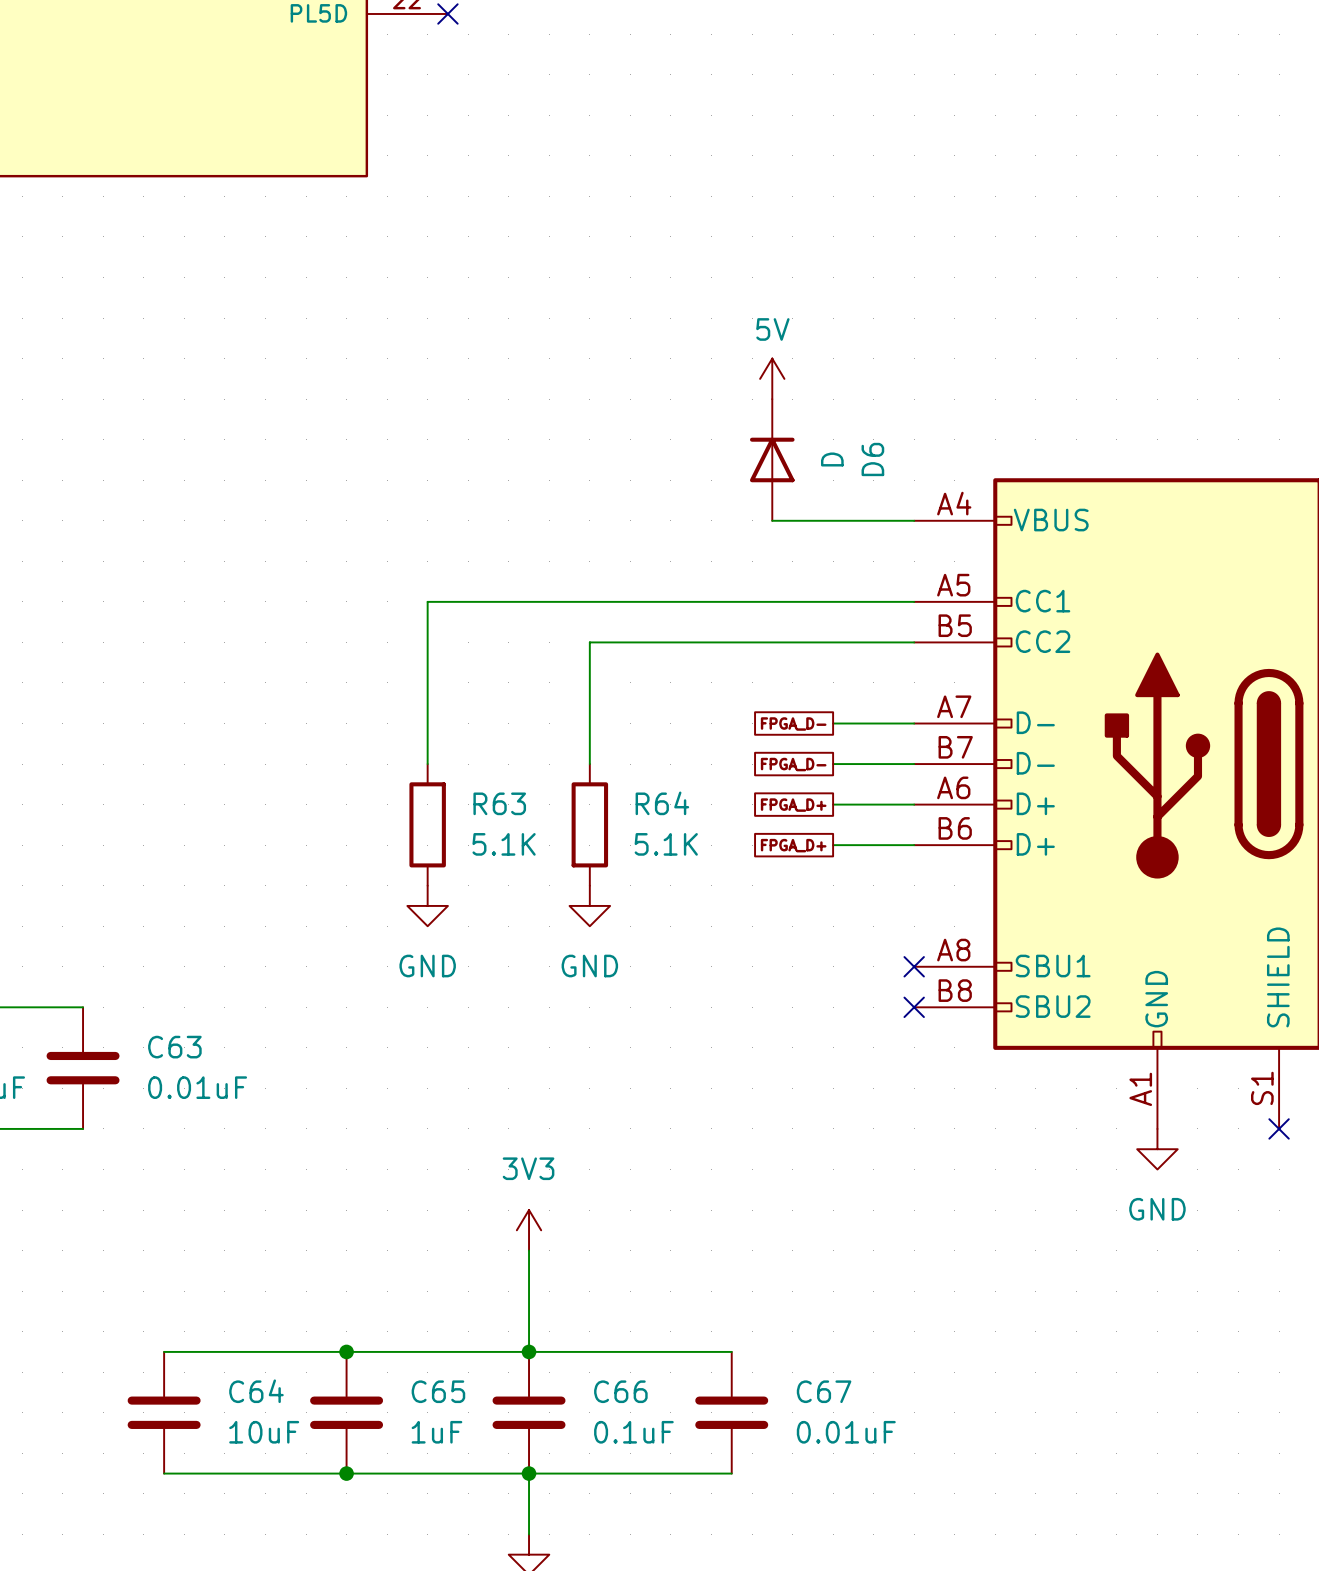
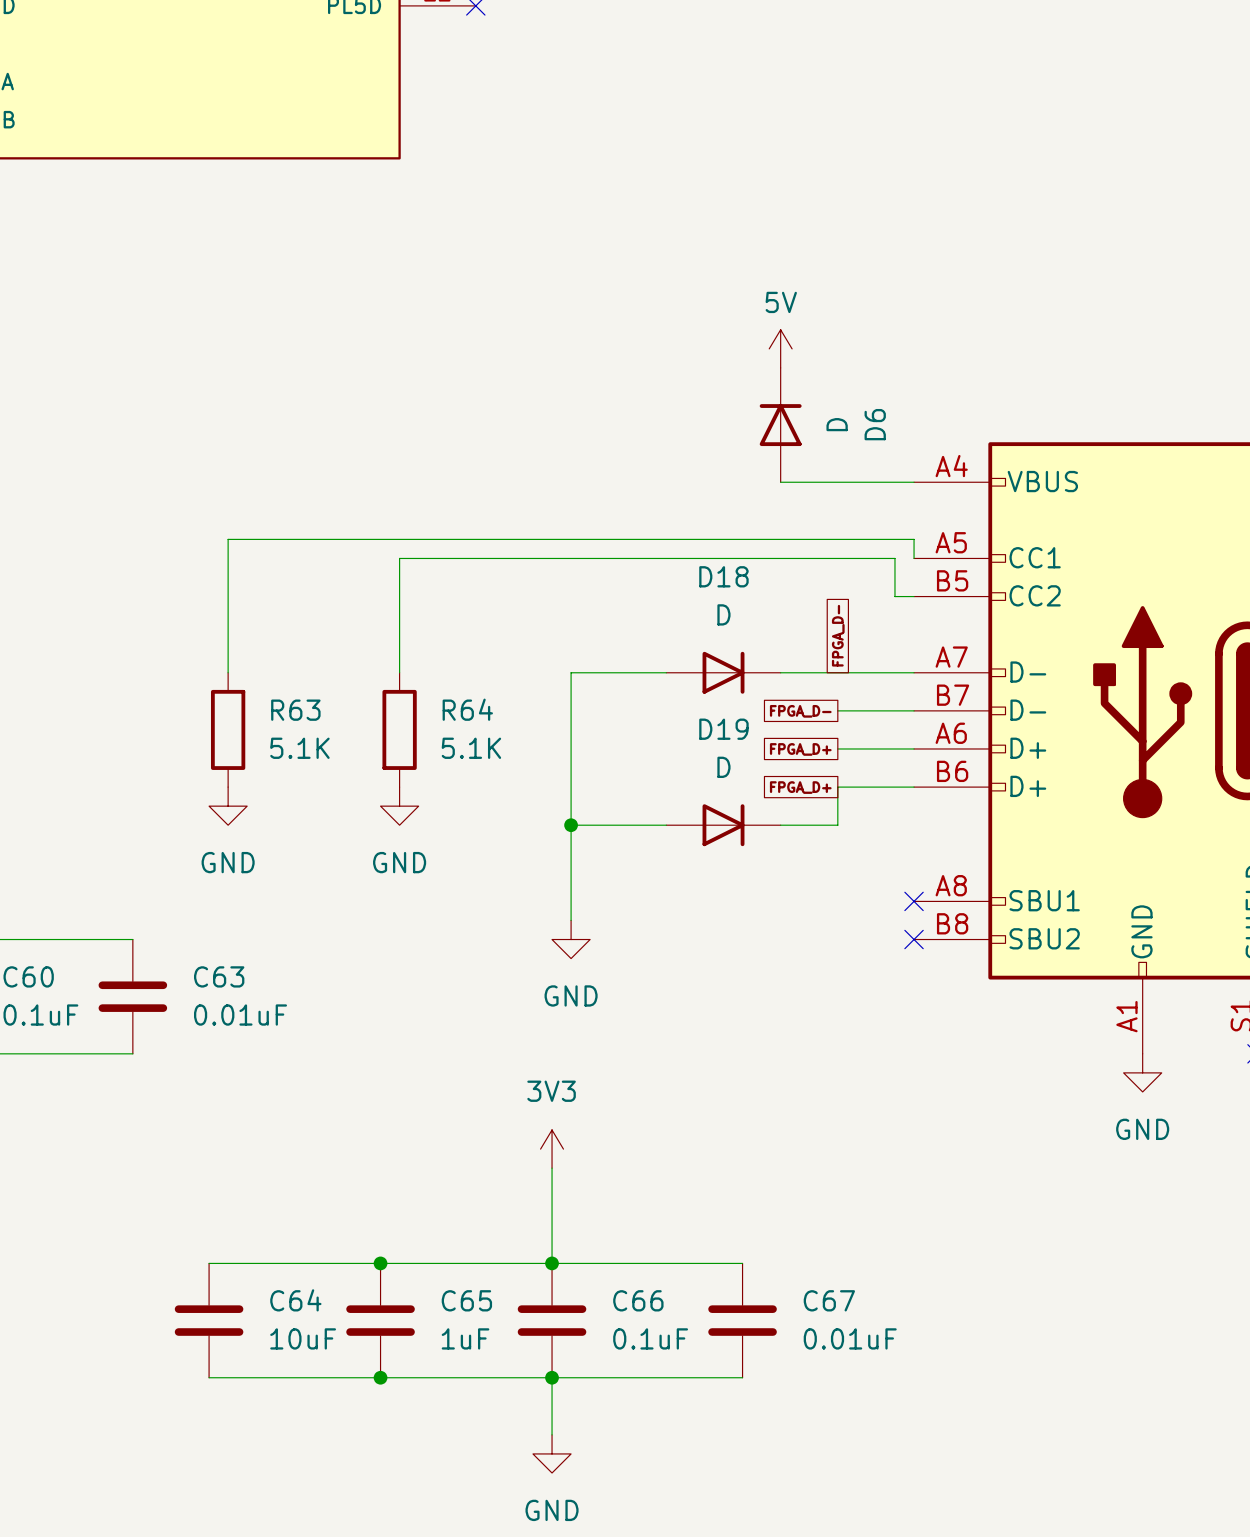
wire: (427, 601) (427, 764) -> (456, 558) (399, 558) (399, 672)
wire: (893, 601) (914, 601) -> (894, 558) (894, 596)
wire: none -> (914, 558) (914, 539) (228, 539) (228, 672)
wire: (893, 642) (589, 642) (589, 764) -> none
wire: none -> (666, 672) (571, 672) (571, 920)
D18: none -> D (723, 672)
wire: none -> (780, 672) (837, 672)
global label rotation: 0° (793, 723) -> 90° clockwise (838, 635)
R63 position: (427, 824) -> (228, 729)
R64 position: (589, 824) -> (399, 729)
wire: none -> (837, 787) (837, 825) (780, 825)
power symbol: none -> GND (228, 806)
wire: none -> (571, 825) (666, 825)
junction: none -> (571, 825)
D19: none -> D (723, 825)
power symbol position: GND (427, 905) -> GND (399, 806)
power symbol: GND (589, 905) -> none
power symbol: none -> GND (571, 939)

